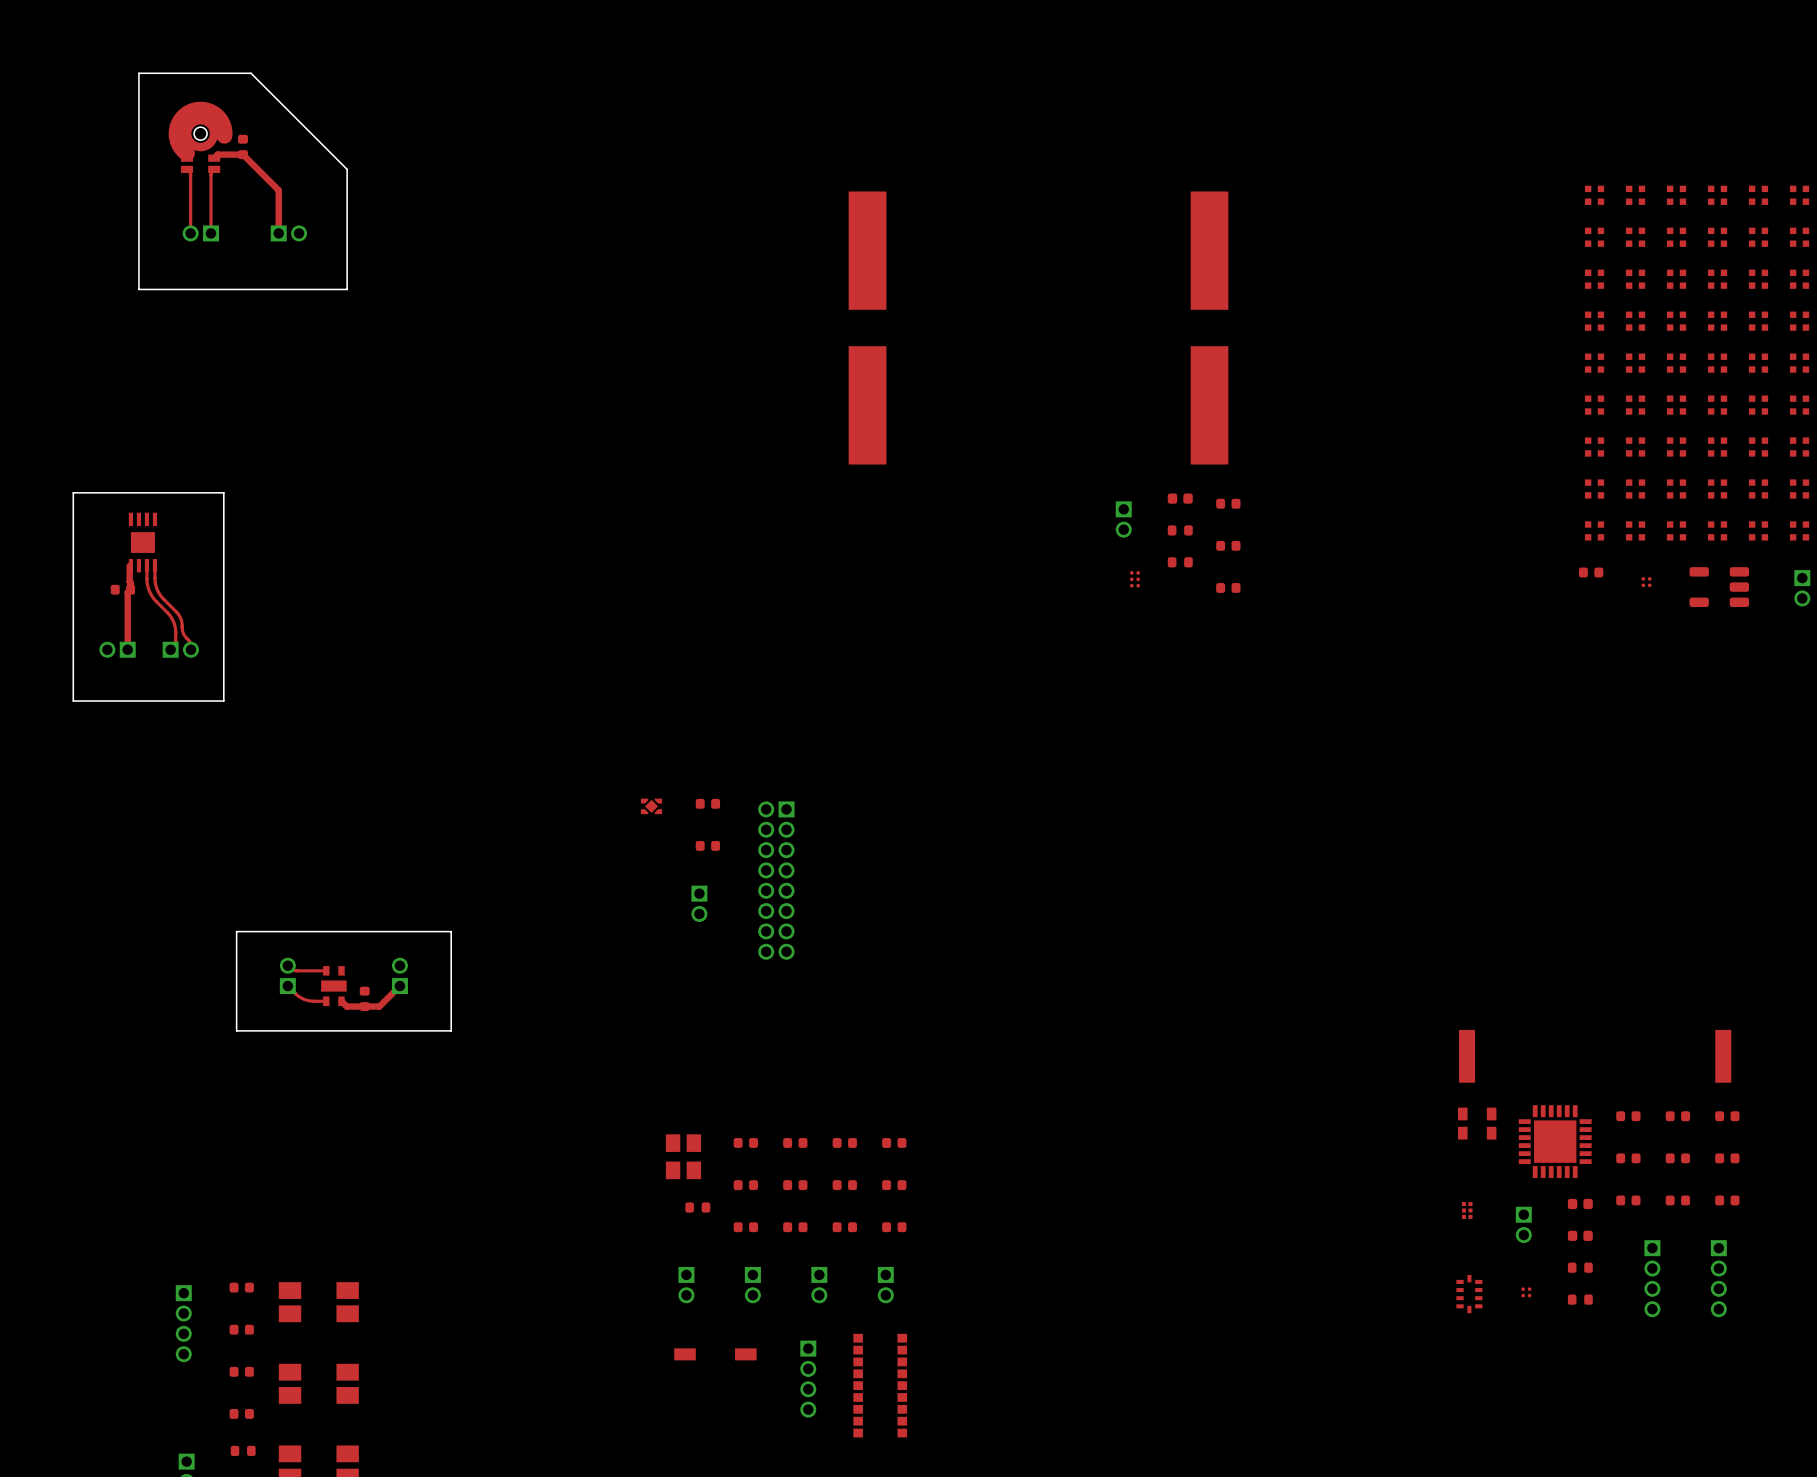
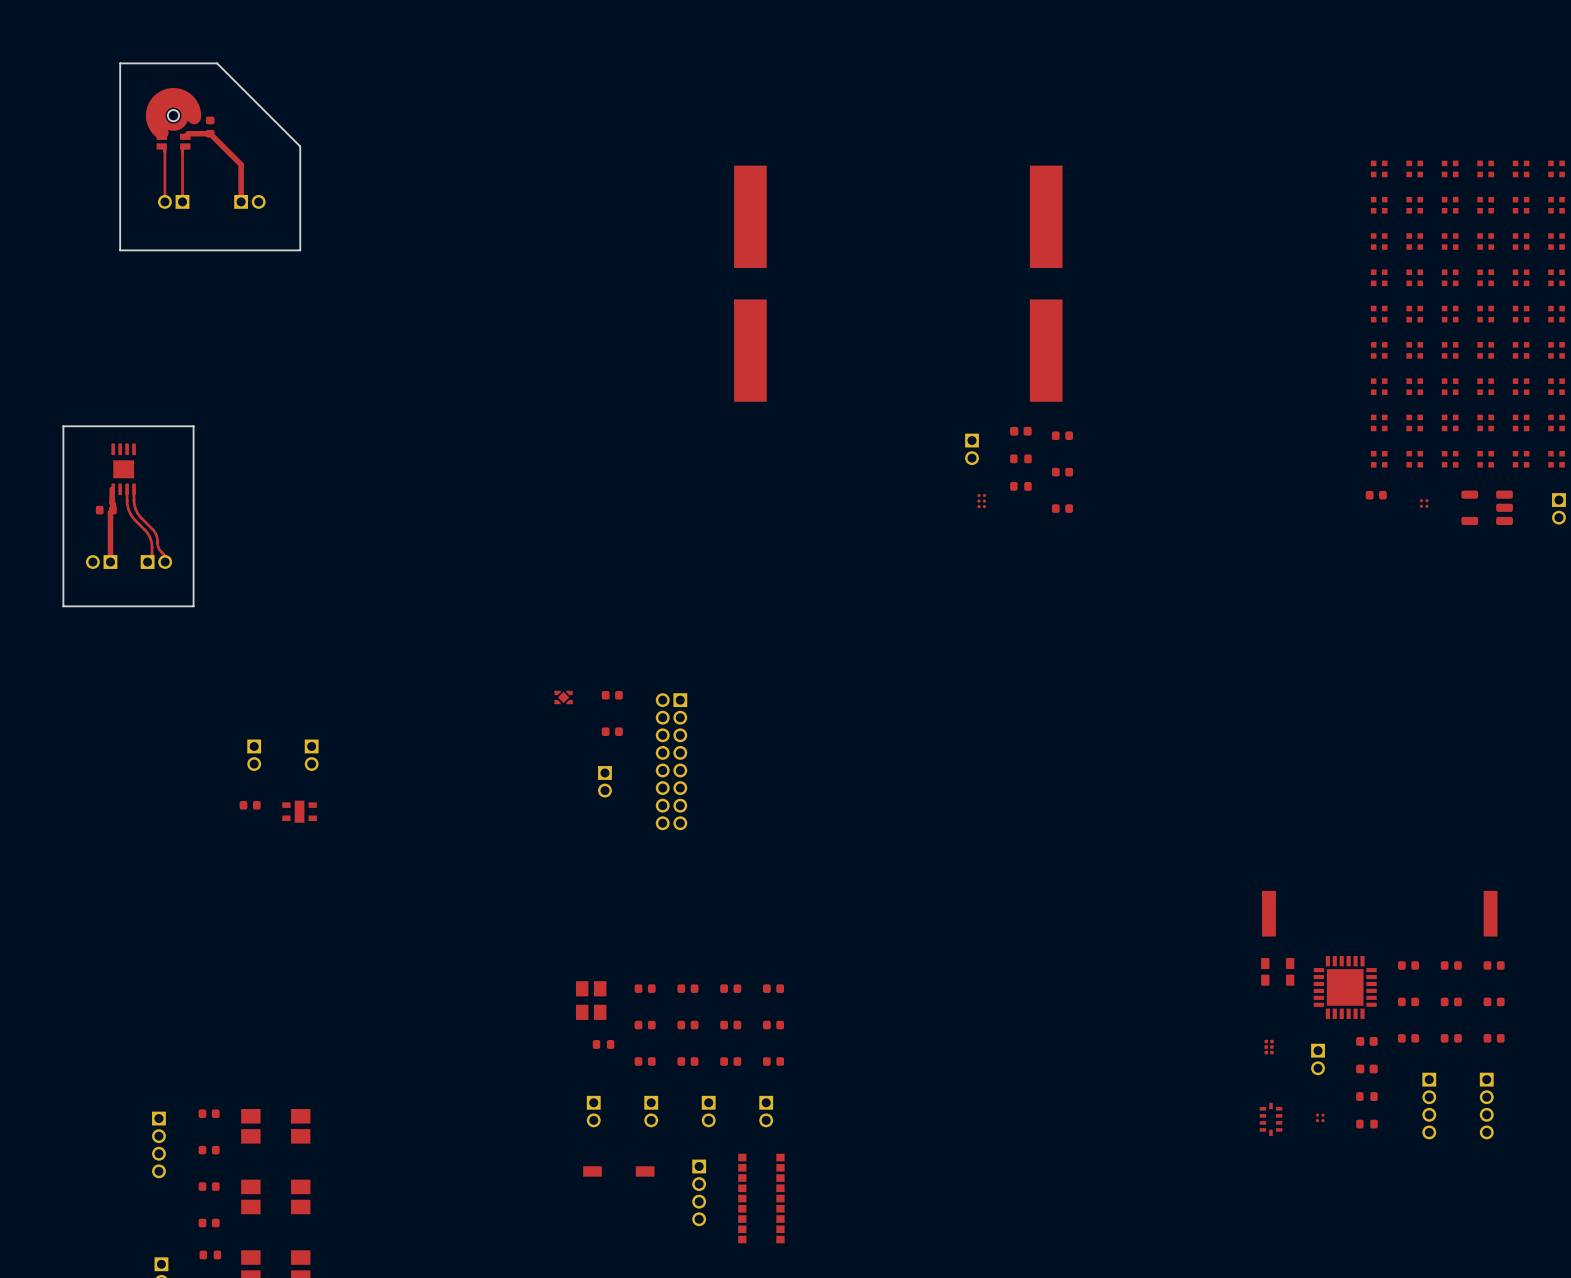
part: none -> (254, 755)
part: none -> (311, 755)
board edge: (451, 931) (236, 931) (236, 1030) (451, 1030) (451, 931) -> none
top track: (287, 965) (295, 970) (326, 970) -> none
part: (287, 975) -> none
part: (399, 975) -> none
top track: (287, 986) (303, 999) (326, 1001) -> none
part rotation: 0° (333, 986) -> 90° clockwise (299, 811)
part position: (333, 986) -> (299, 811)
top track: (399, 986) (379, 1006) (346, 1006) (341, 1001) -> none
part rotation: 0° (364, 998) -> 90° clockwise (250, 805)
part position: (364, 998) -> (250, 805)

